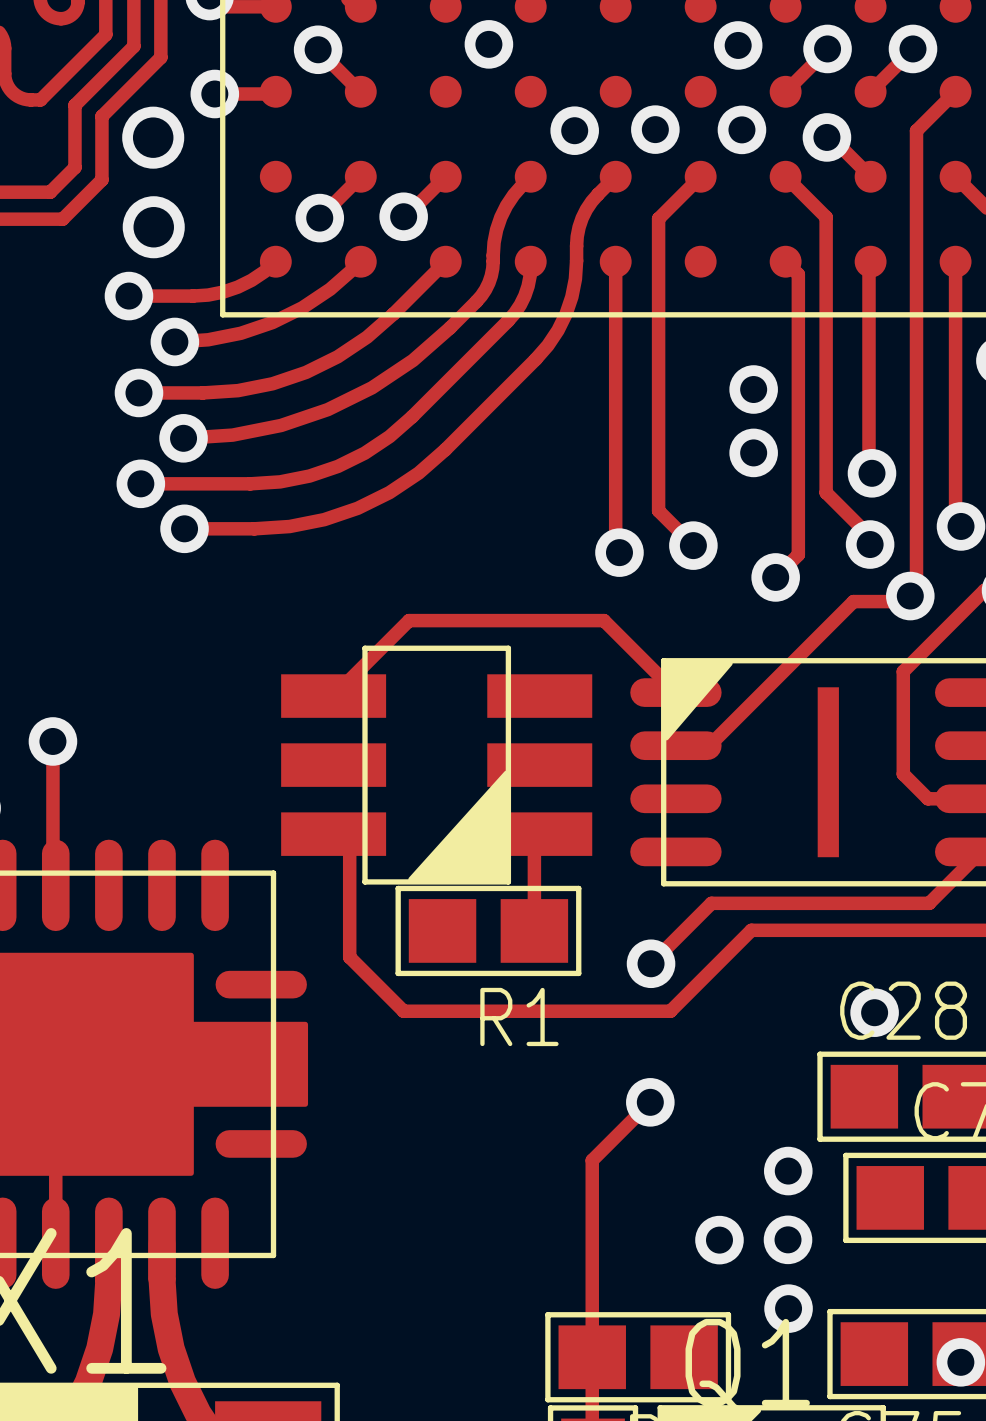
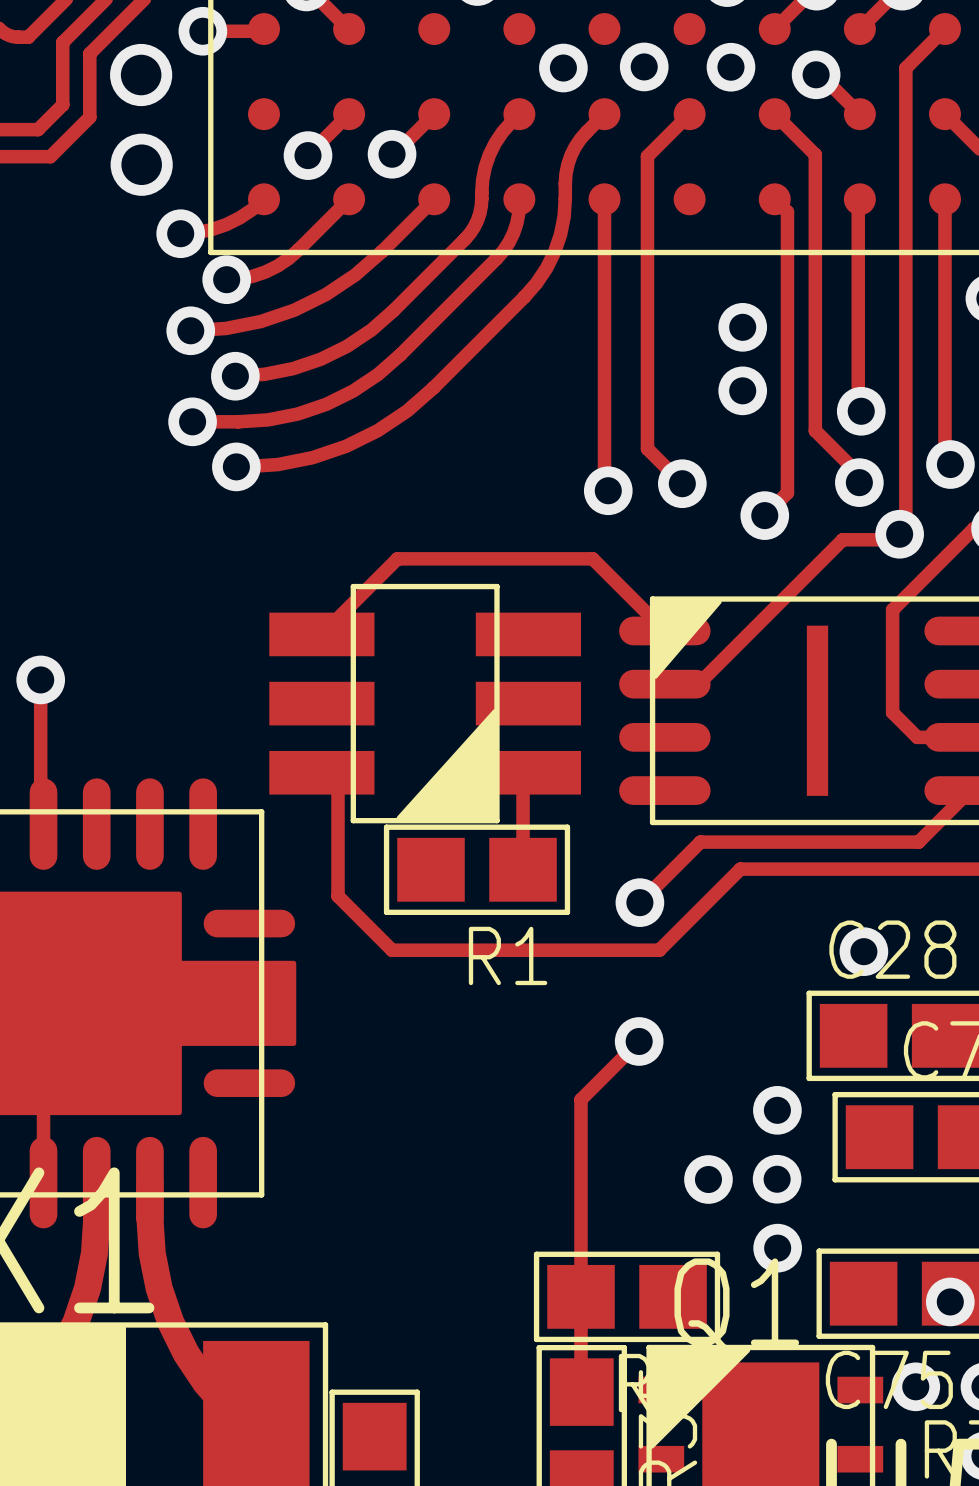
track: (355, 267) (330, 289) (302, 307) (272, 322) (240, 333) (208, 339) (174, 341) -> (343, 204) (298, 249) (277, 266) (252, 276) (226, 279)
track: (128, 296) (192, 296) -> none
via: (128, 296) -> none
track: (450, 327) (412, 360) (371, 387) (327, 409) (281, 425) (232, 435) (183, 438) -> (438, 265) (393, 310) (371, 330) (347, 346) (320, 359) (293, 368) (264, 374) (235, 376)
via position: (174, 341) -> (180, 233)
via: none -> (226, 279)
track: (138, 392) (202, 392) -> none
via: (138, 392) -> none
via: none -> (190, 330)
via: (183, 438) -> none
via: none -> (235, 376)
track: (140, 483) (204, 483) -> none
via: (140, 483) -> none
via: none -> (192, 421)
track: (184, 528) (248, 528) -> none
via: (184, 528) -> none
via: none -> (236, 466)

